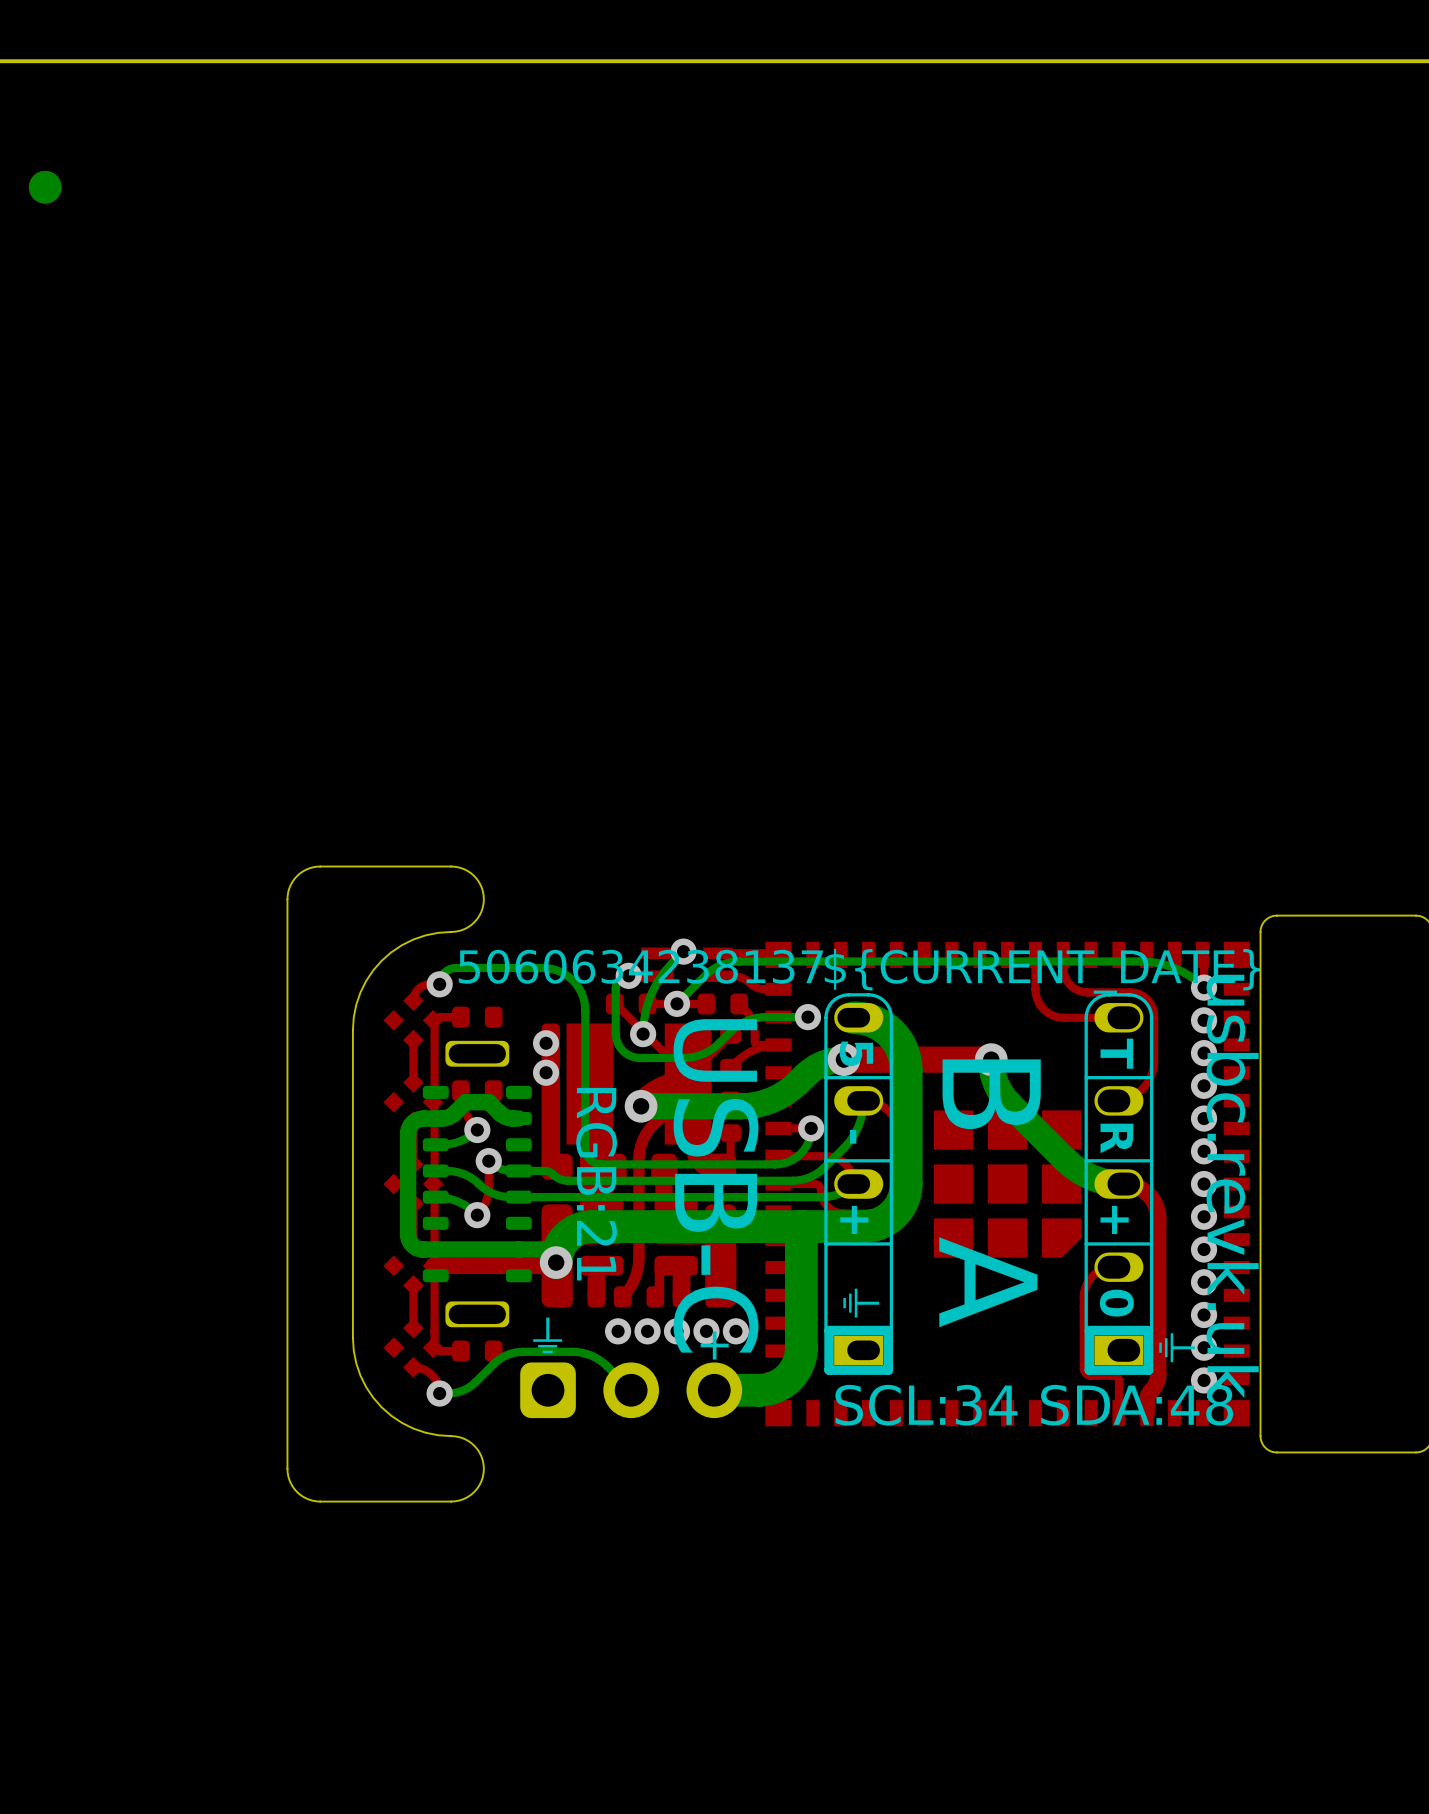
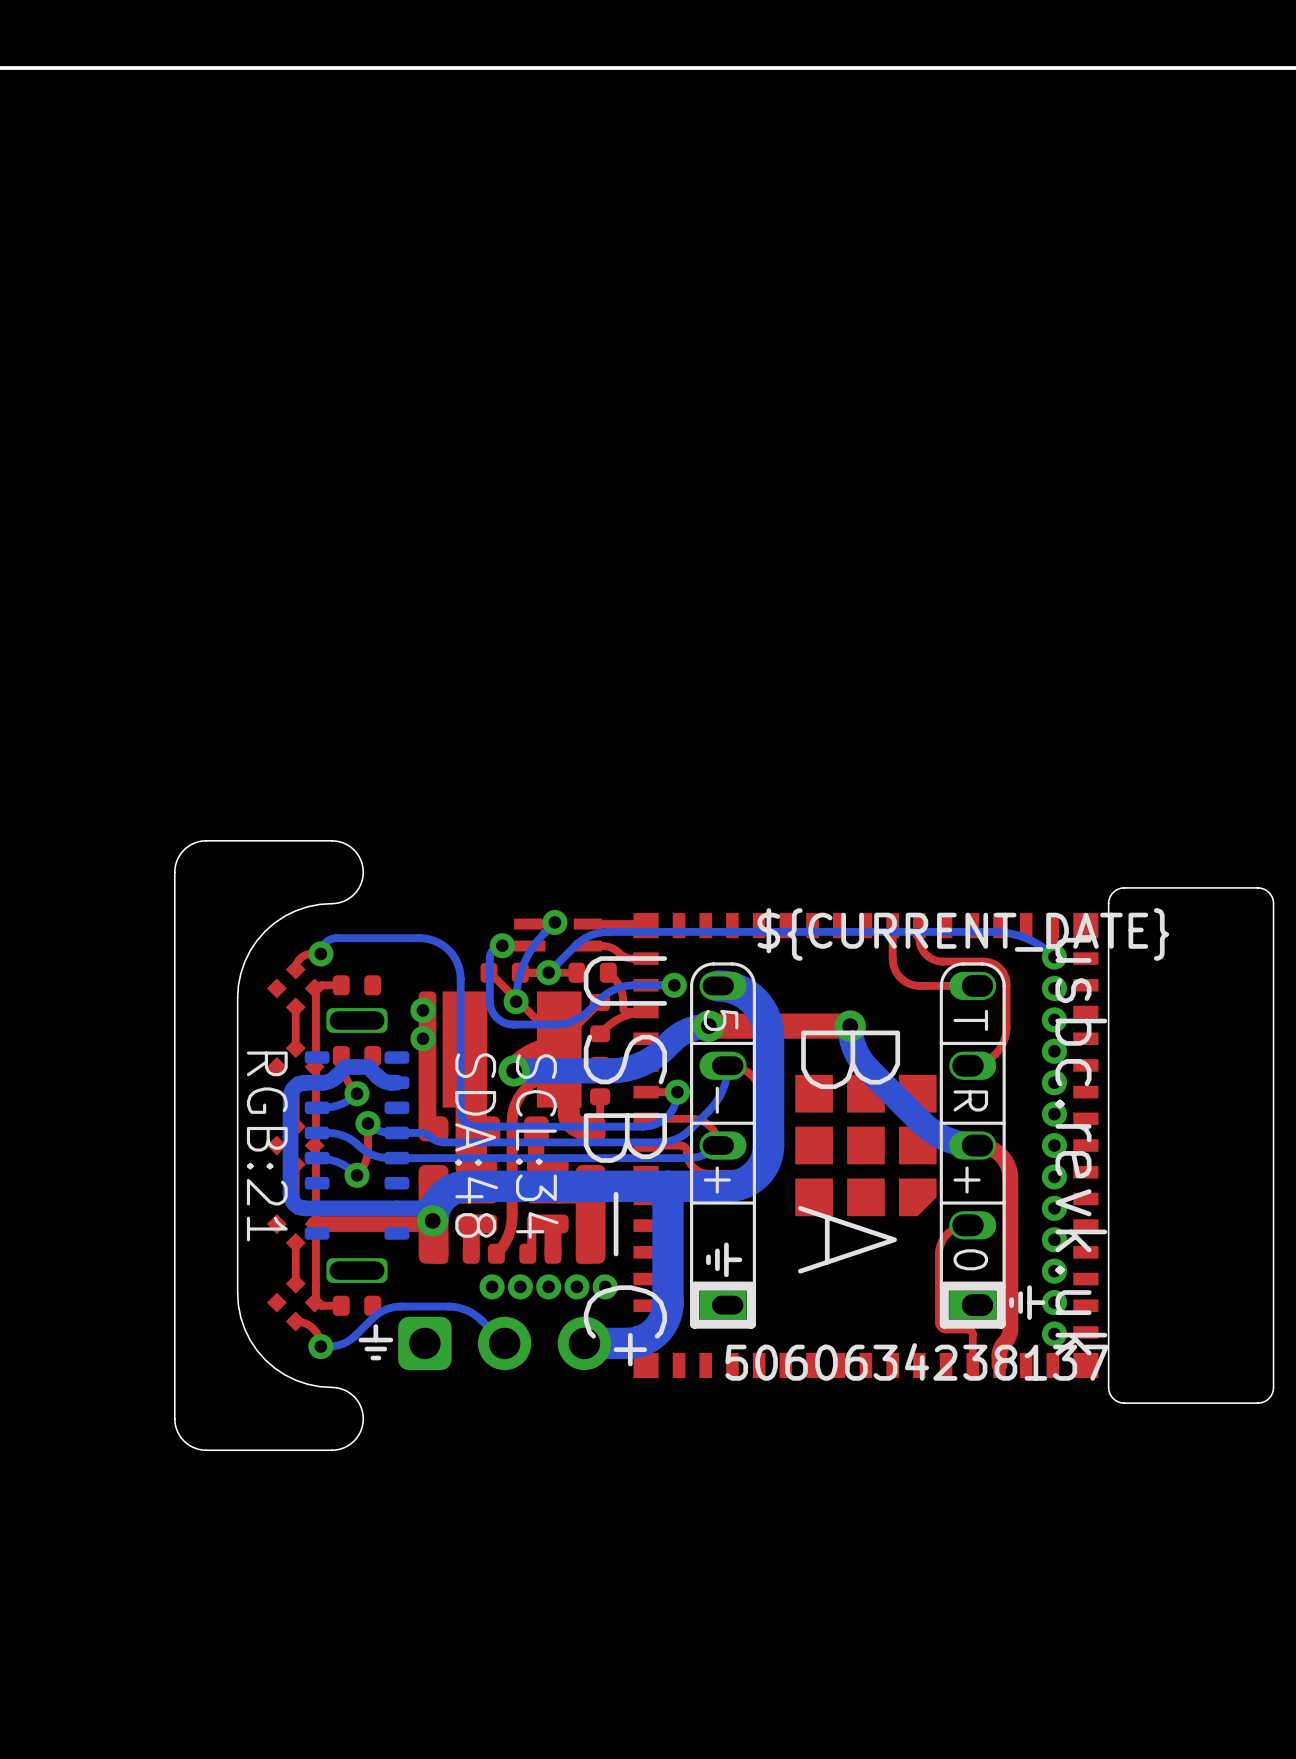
text position: 5060634238137 (640, 966) -> 5060634238137 (916, 1361)
text position: ${CURRENT_DATE} (1042, 971) -> ${CURRENT_DATE} (963, 934)
text: none -> SDA:48 (476, 1145)
text position: RGB:21 (596, 1184) -> RGB:21 (267, 1146)
text: none -> SCL:34 (537, 1146)
text position: USB-C (716, 1185) -> USB-C (625, 1147)
text position: ⏚ (547, 1335) -> ⏚ (375, 1342)
text position: + (714, 1345) -> + (630, 1349)
text: SCL:34 SDA:48 (1034, 1405) -> none

